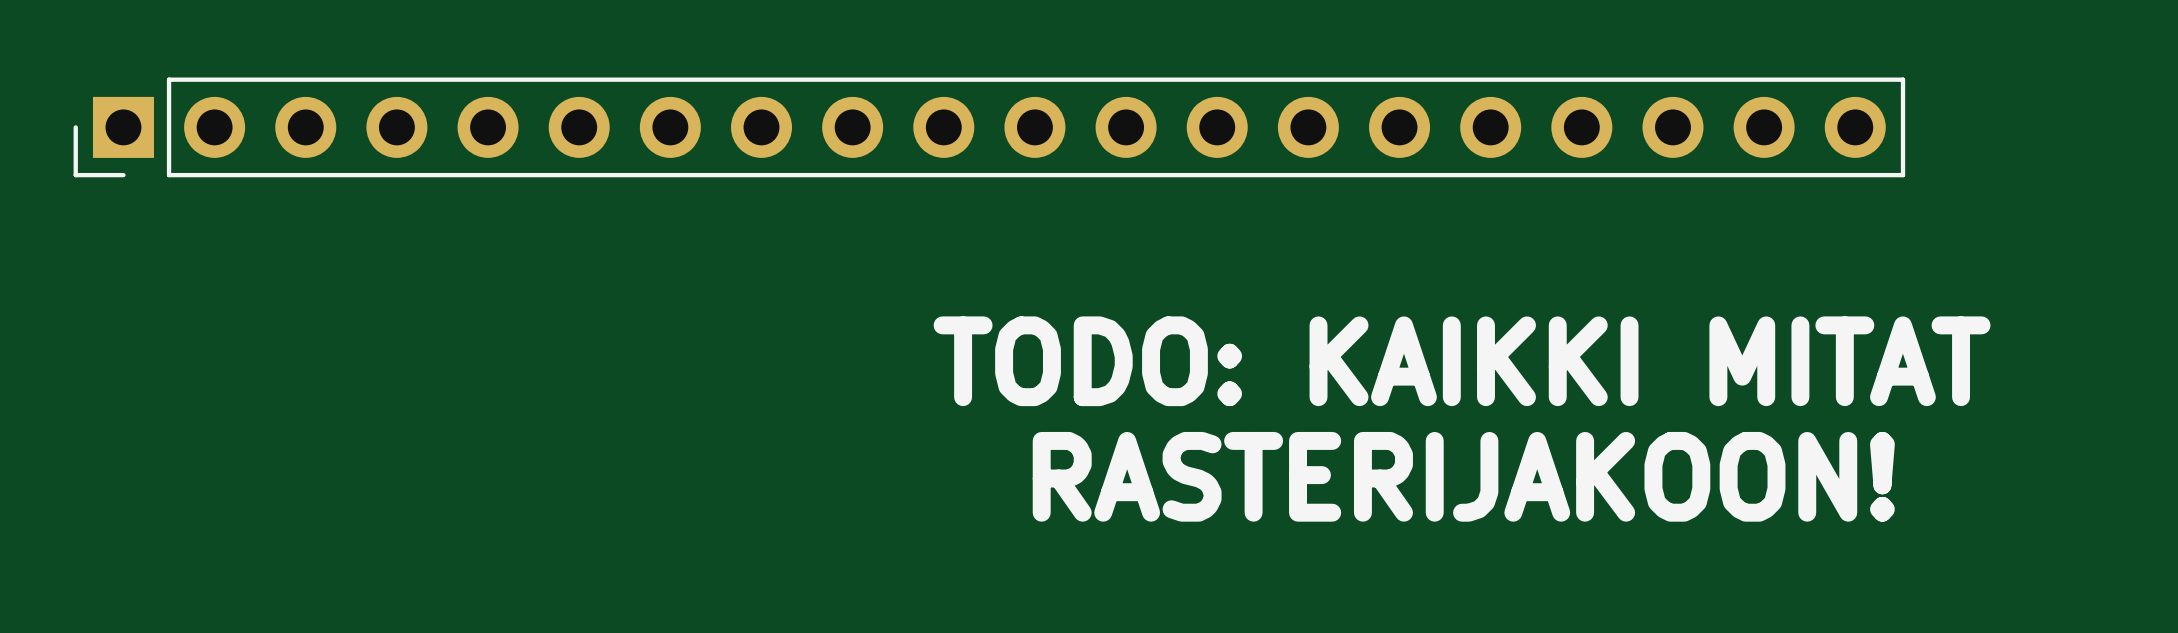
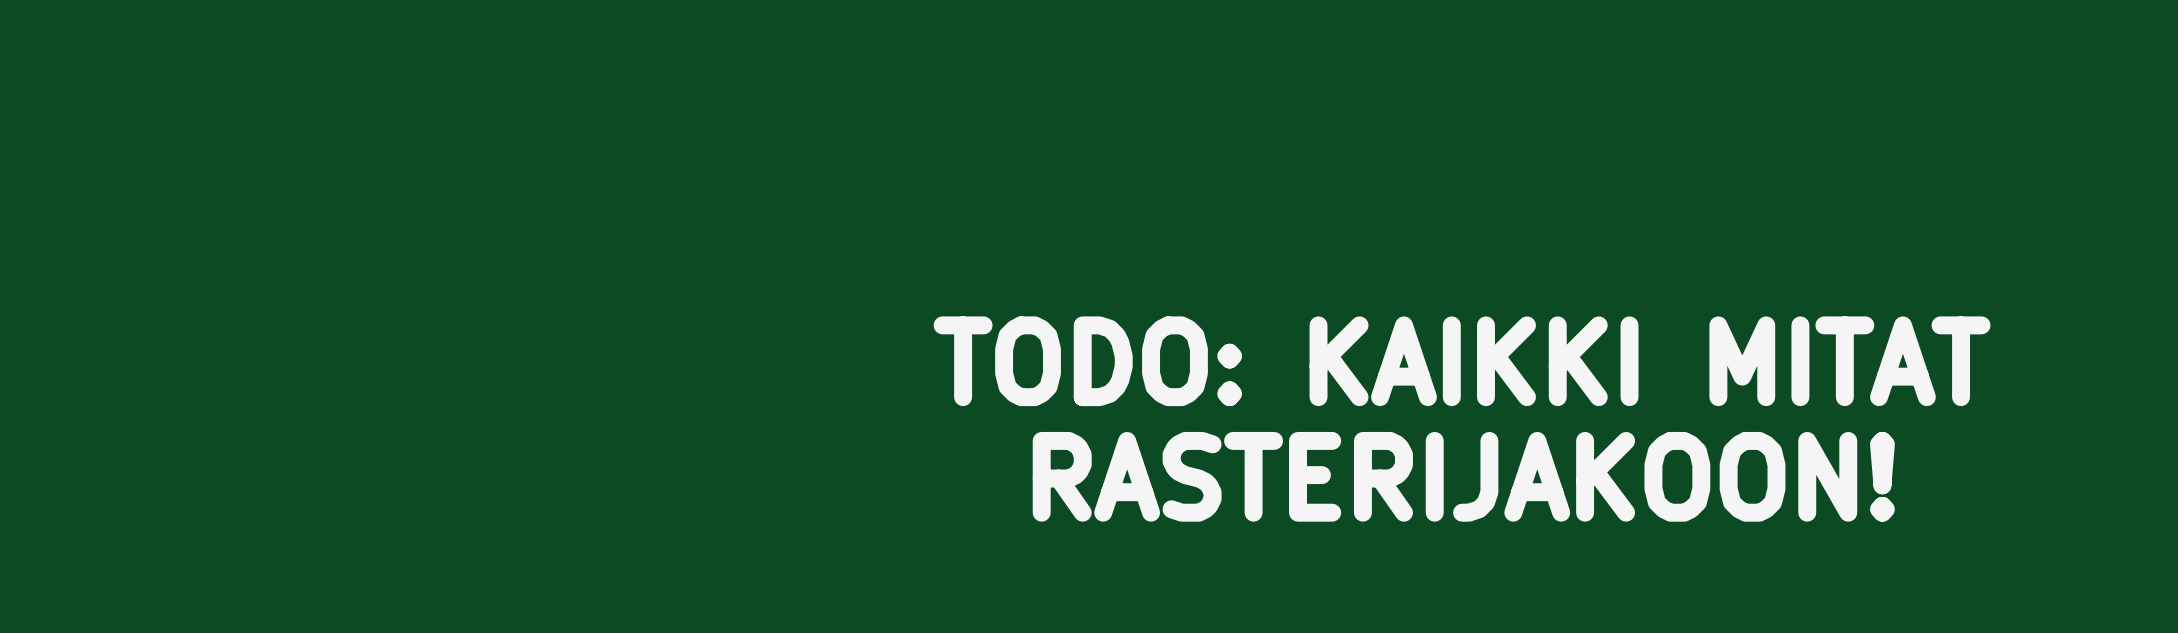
part: (989, 127) -> none

